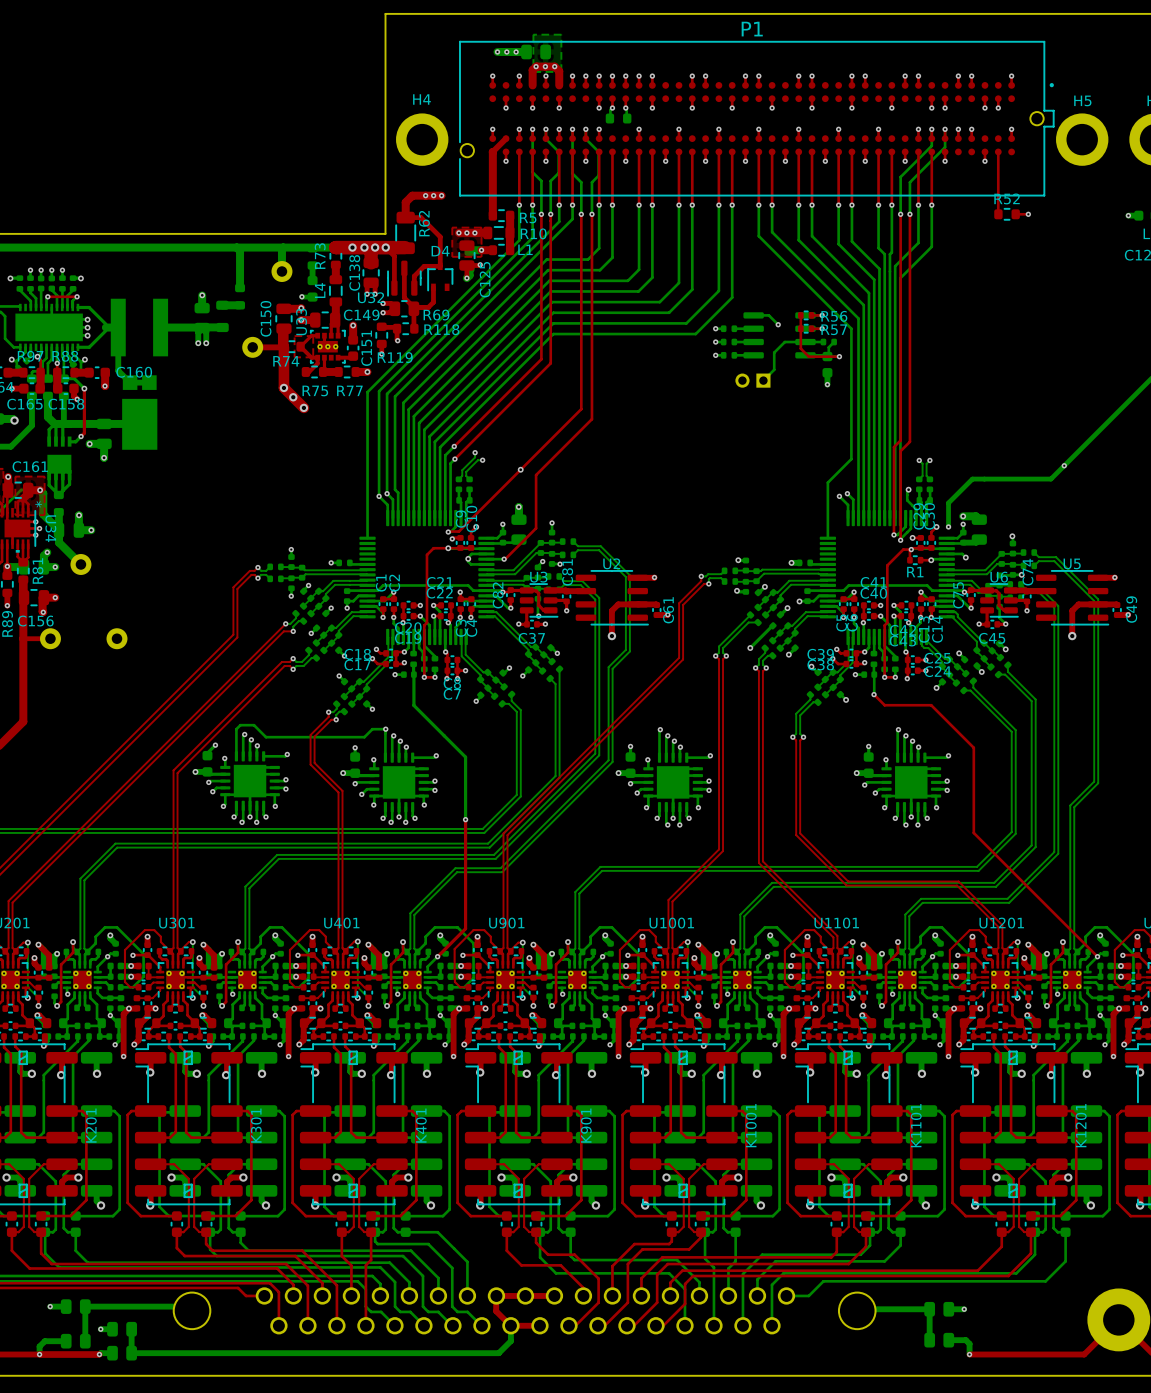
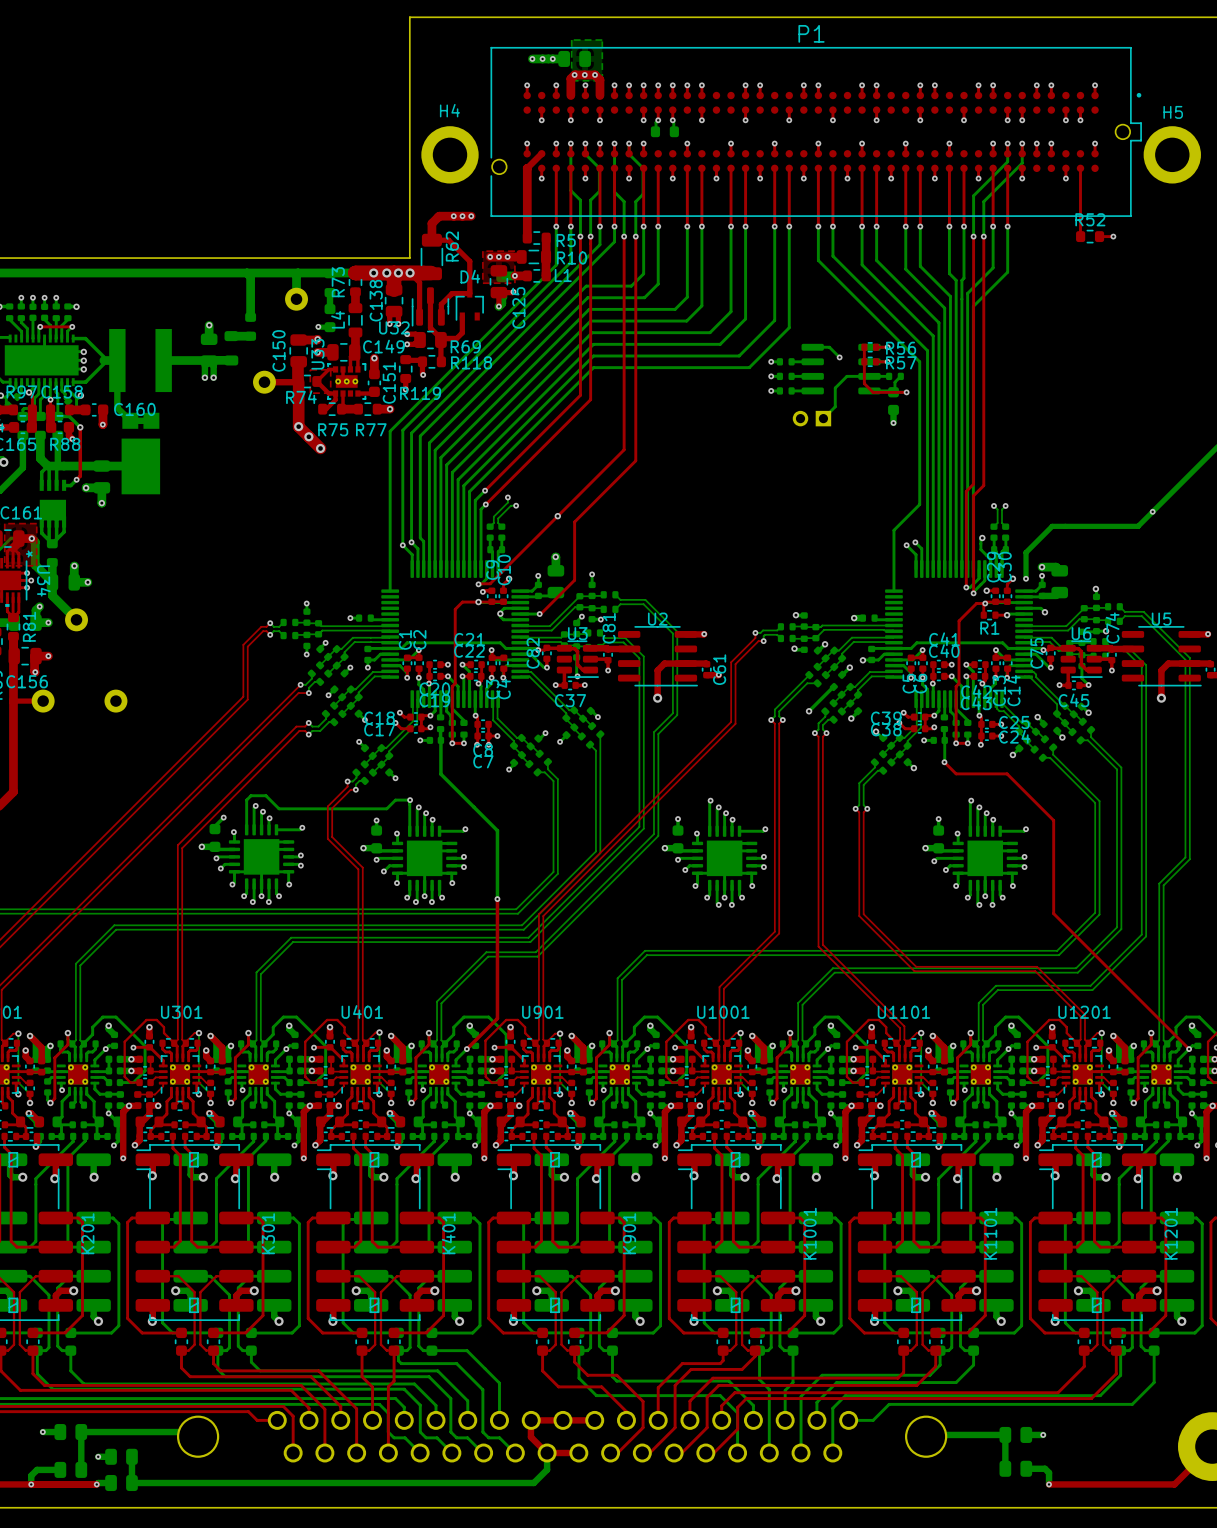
R88 name position: R88 (65, 356) -> R88 (65, 444)
C158 name position: C158 (66, 404) -> C158 (62, 391)

